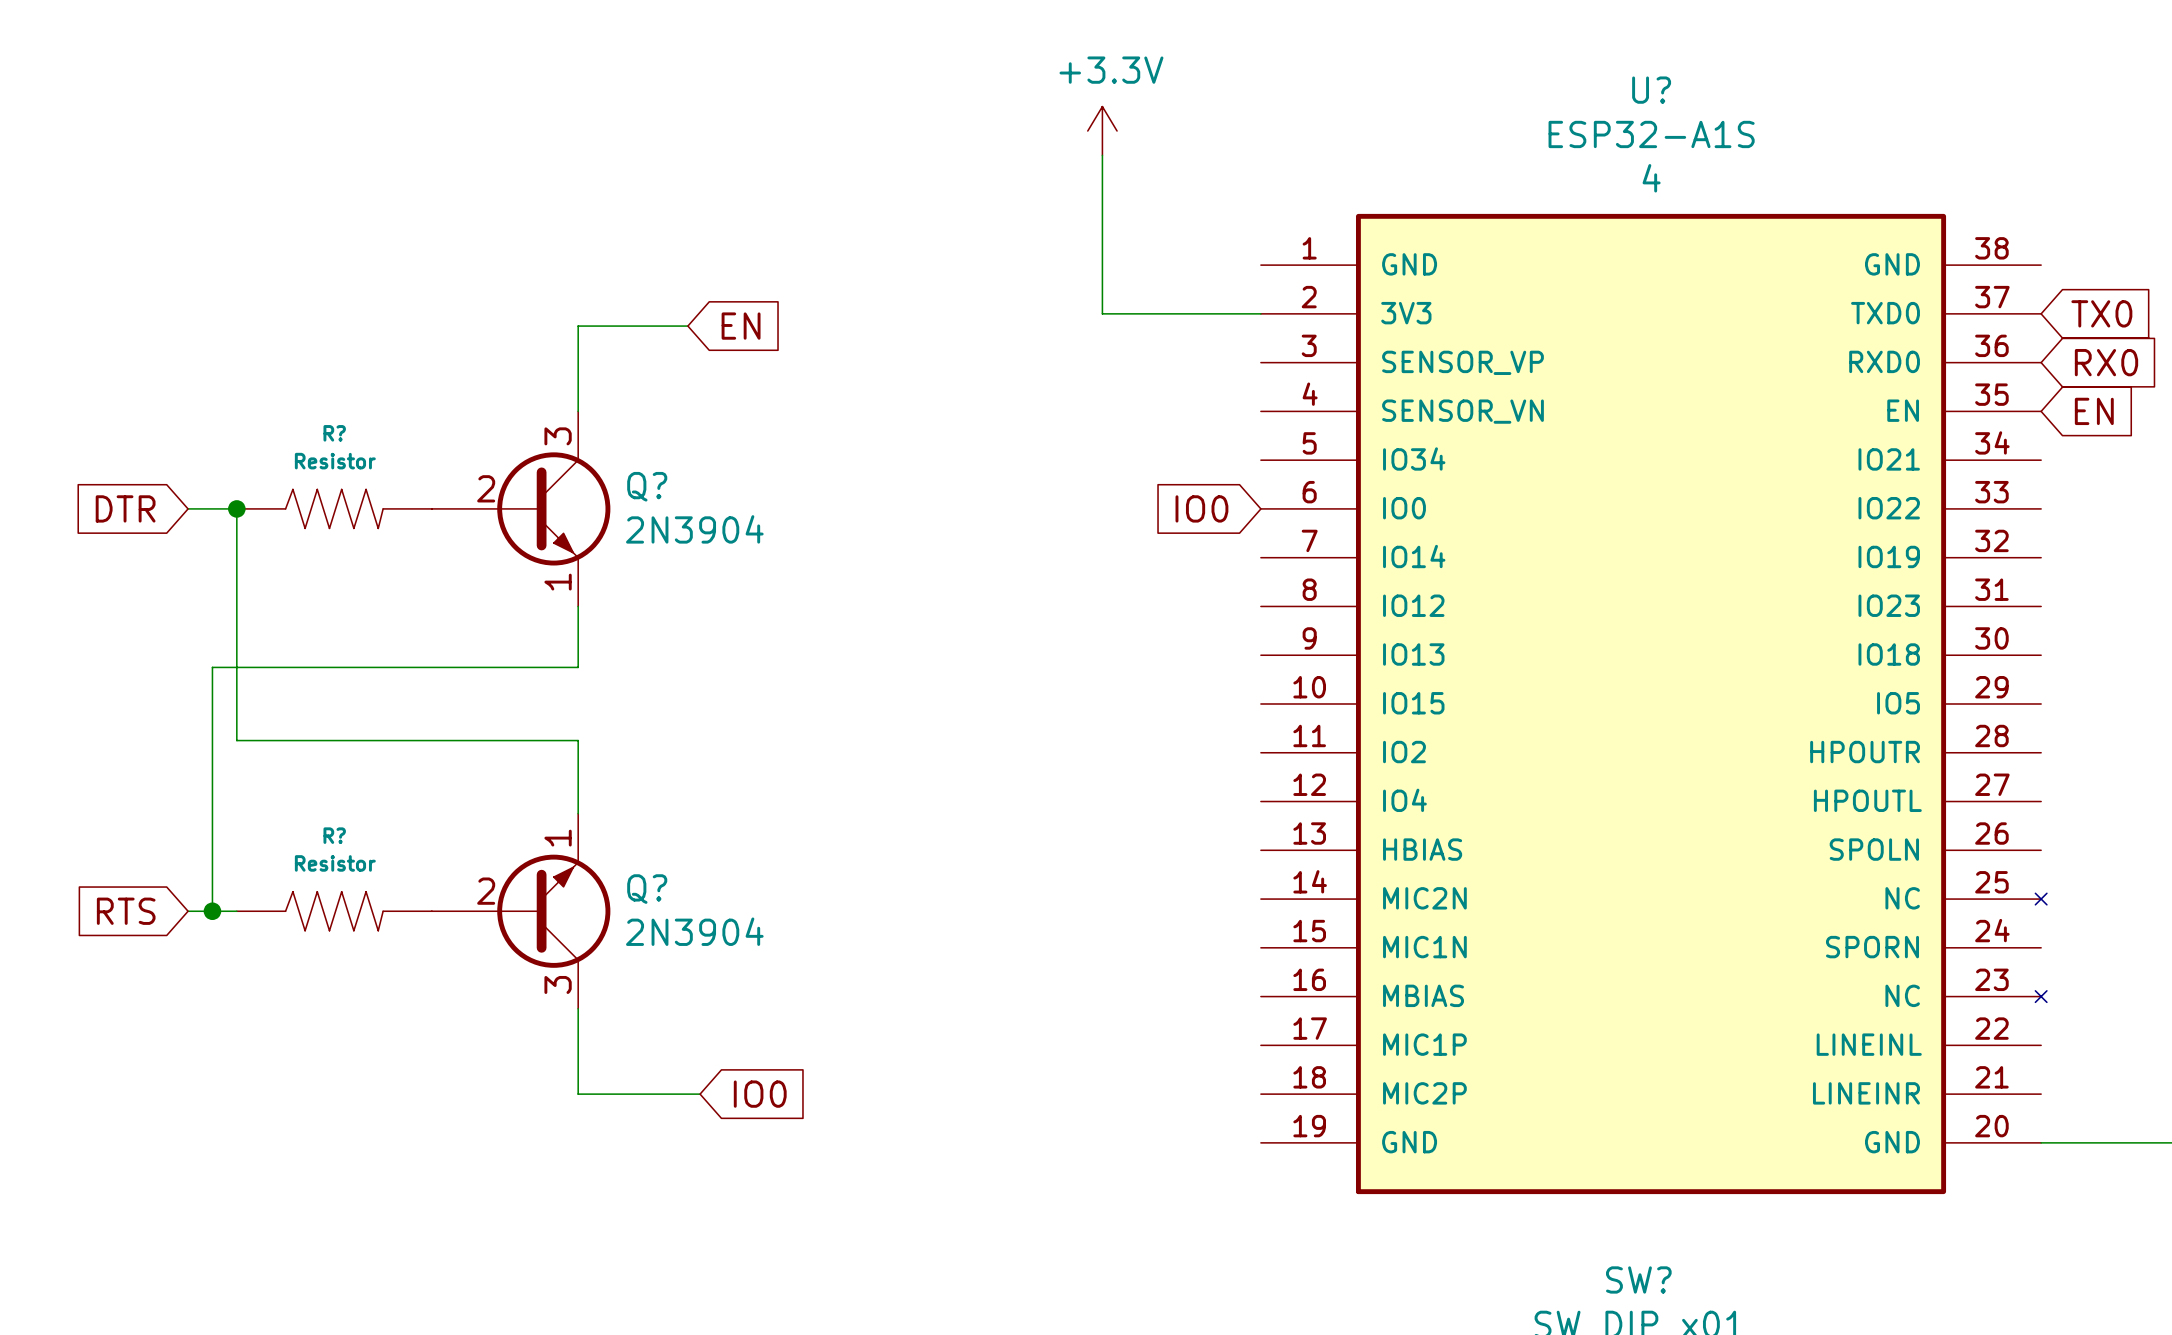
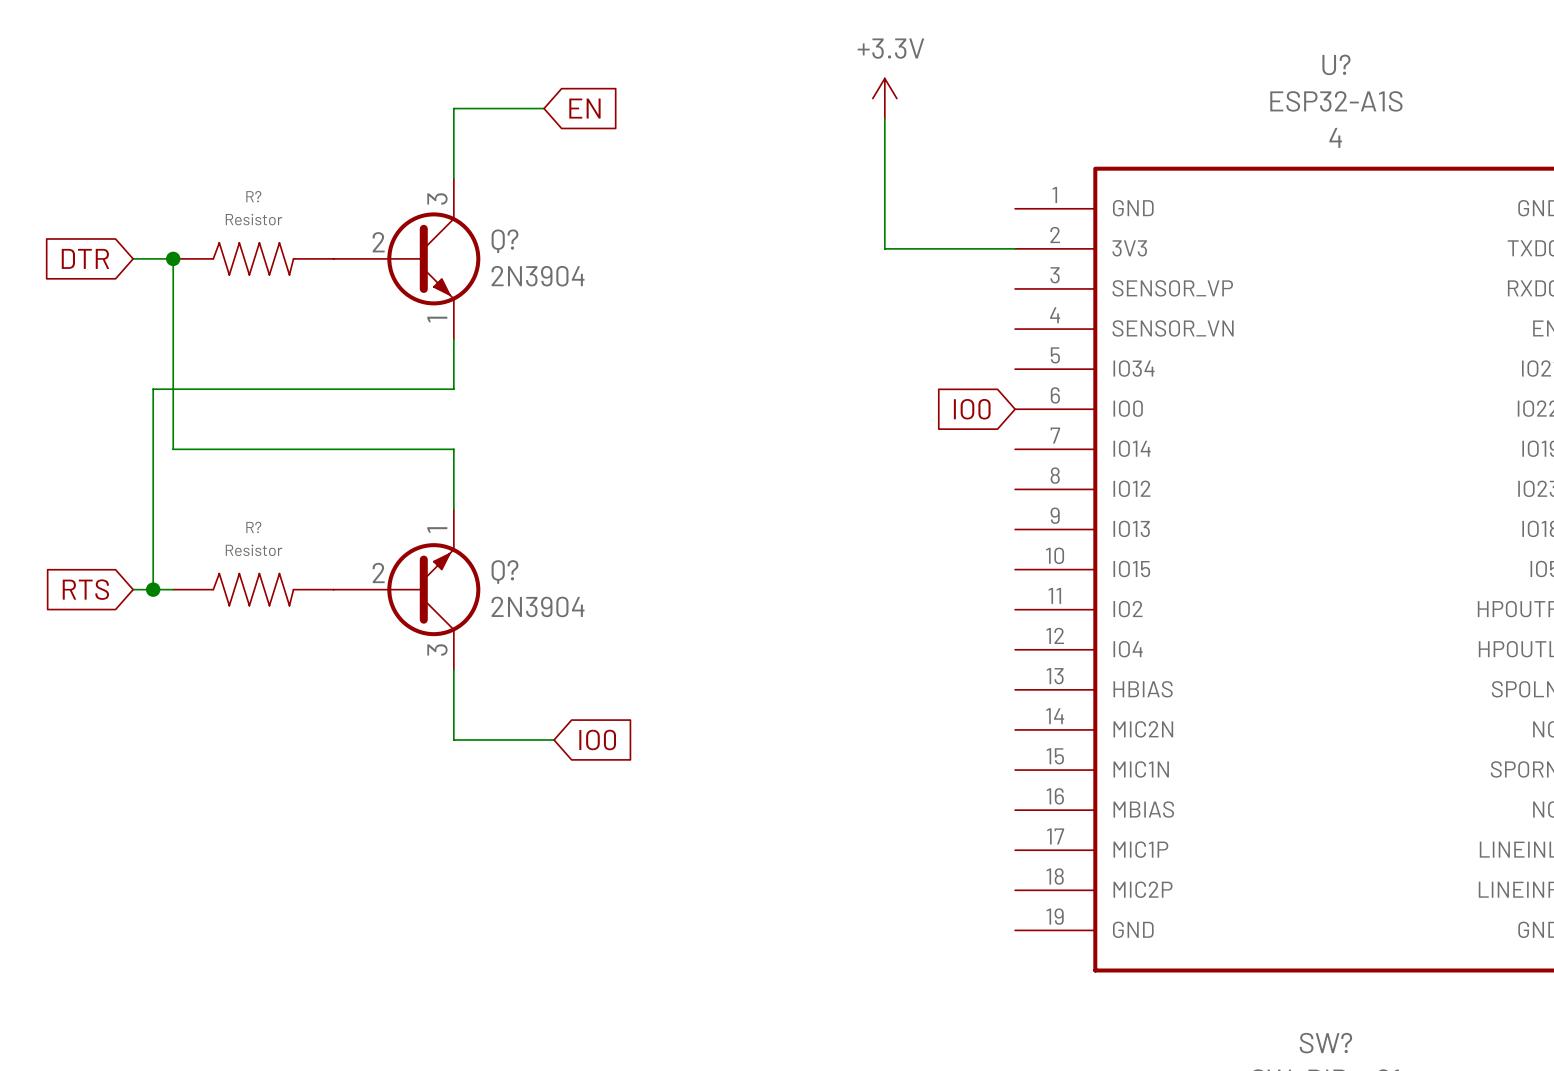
junction: none -> (173, 258)
R?: none -> Resistor (253, 258)
wire: (687, 326) (578, 326) (578, 411) -> (544, 108) (453, 108) (453, 178)
global label position: EN (741, 326) -> EN (584, 108)
global label position: DTR (125, 508) -> DTR (85, 258)
wire: (188, 508) (236, 508) -> (133, 258) (173, 258) (173, 409)
junction: (236, 508) -> none
R?: Resistor (334, 508) -> none
Q? position: (521, 508) -> (406, 258)
wire: (236, 557) (236, 740) (578, 740) (578, 813) -> (173, 449) (453, 449) (453, 489)
wire: (578, 630) (578, 667) (212, 667) -> (453, 339) (453, 389) (153, 389) (153, 539)
wire: (212, 728) (212, 911) -> none
junction: none -> (153, 589)
R?: none -> Resistor (253, 589)
global label position: RTS (126, 911) -> RTS (85, 589)
wire: (188, 911) (236, 911) -> (133, 589) (173, 589)
junction: (212, 911) -> none
R?: Resistor (334, 911) -> none
Q? position: (521, 911) -> (406, 589)
wire: (578, 1008) (578, 1094) (700, 1094) -> (453, 669) (453, 739) (554, 739)
global label position: IO0 (760, 1094) -> IO0 (597, 739)

